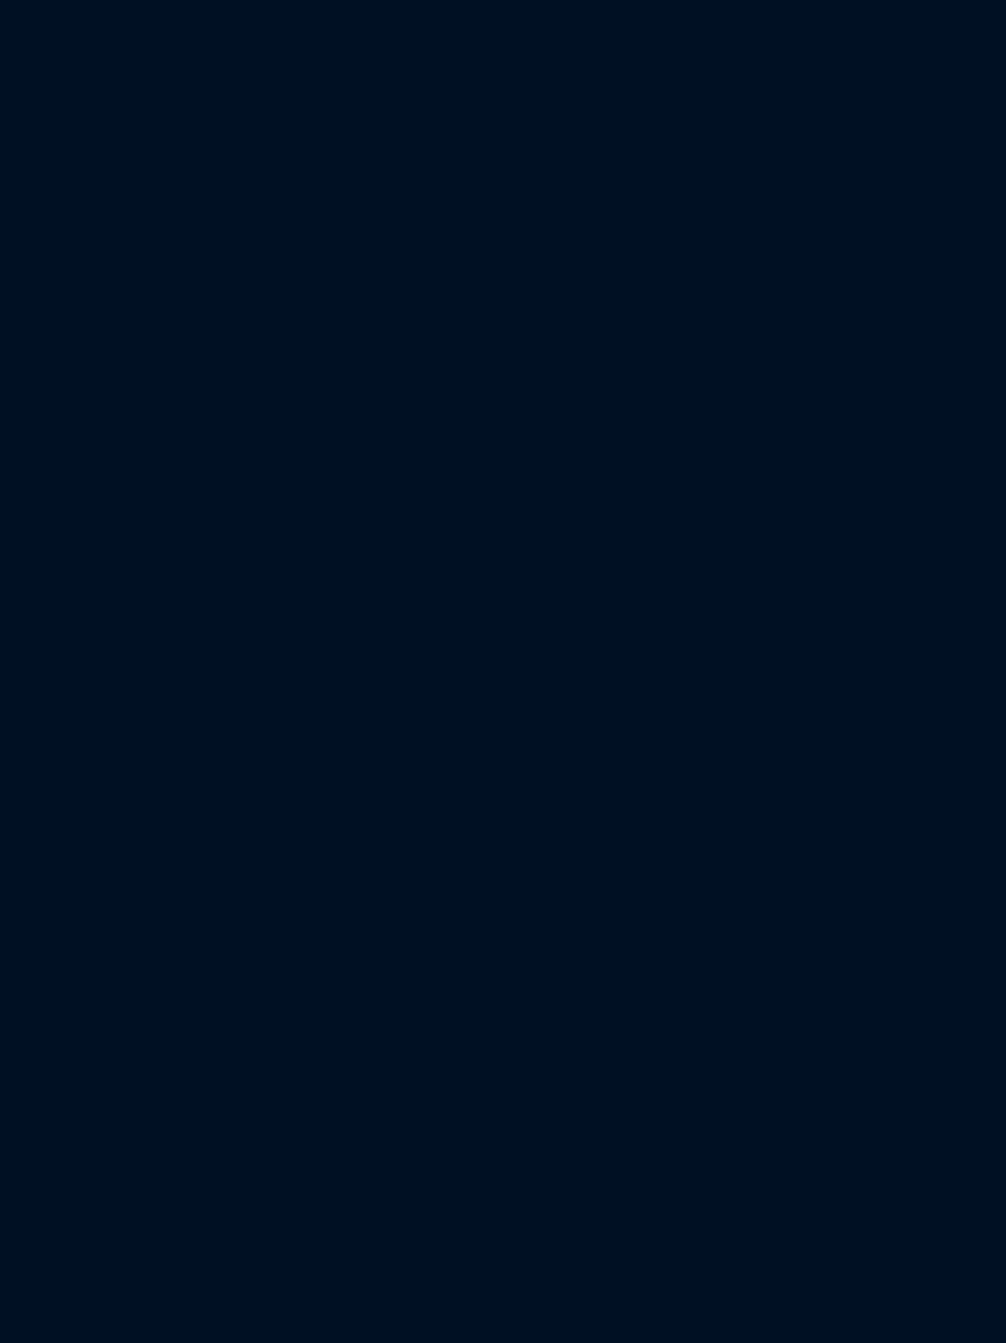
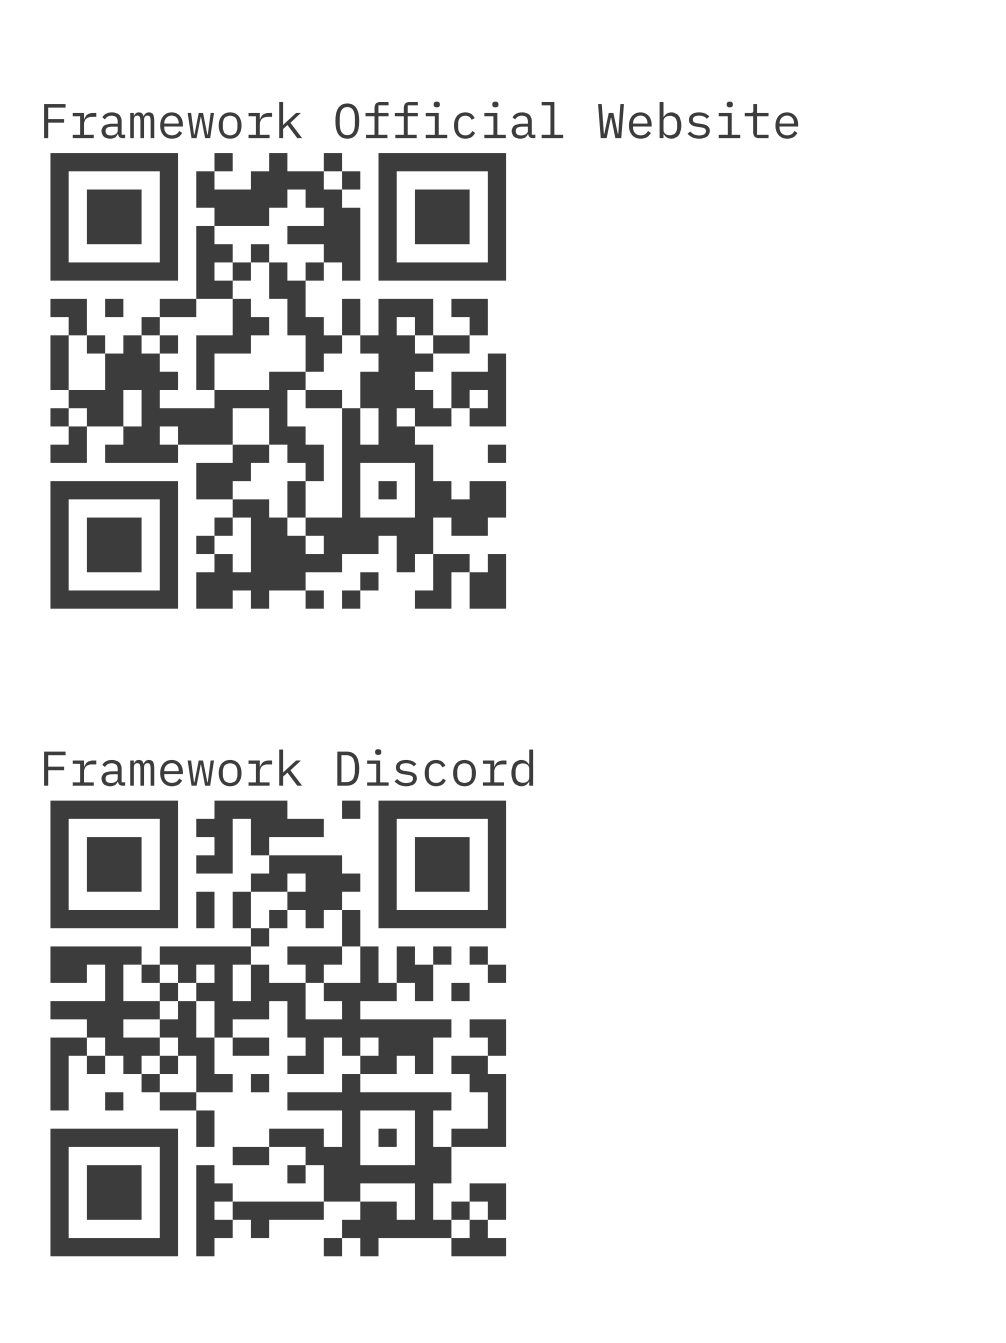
text: none -> Framework Official Website (421, 120)
drawing: none -> [50, 153, 507, 609]
text: none -> Framework Discord (288, 767)
drawing: none -> [50, 800, 507, 1257]

